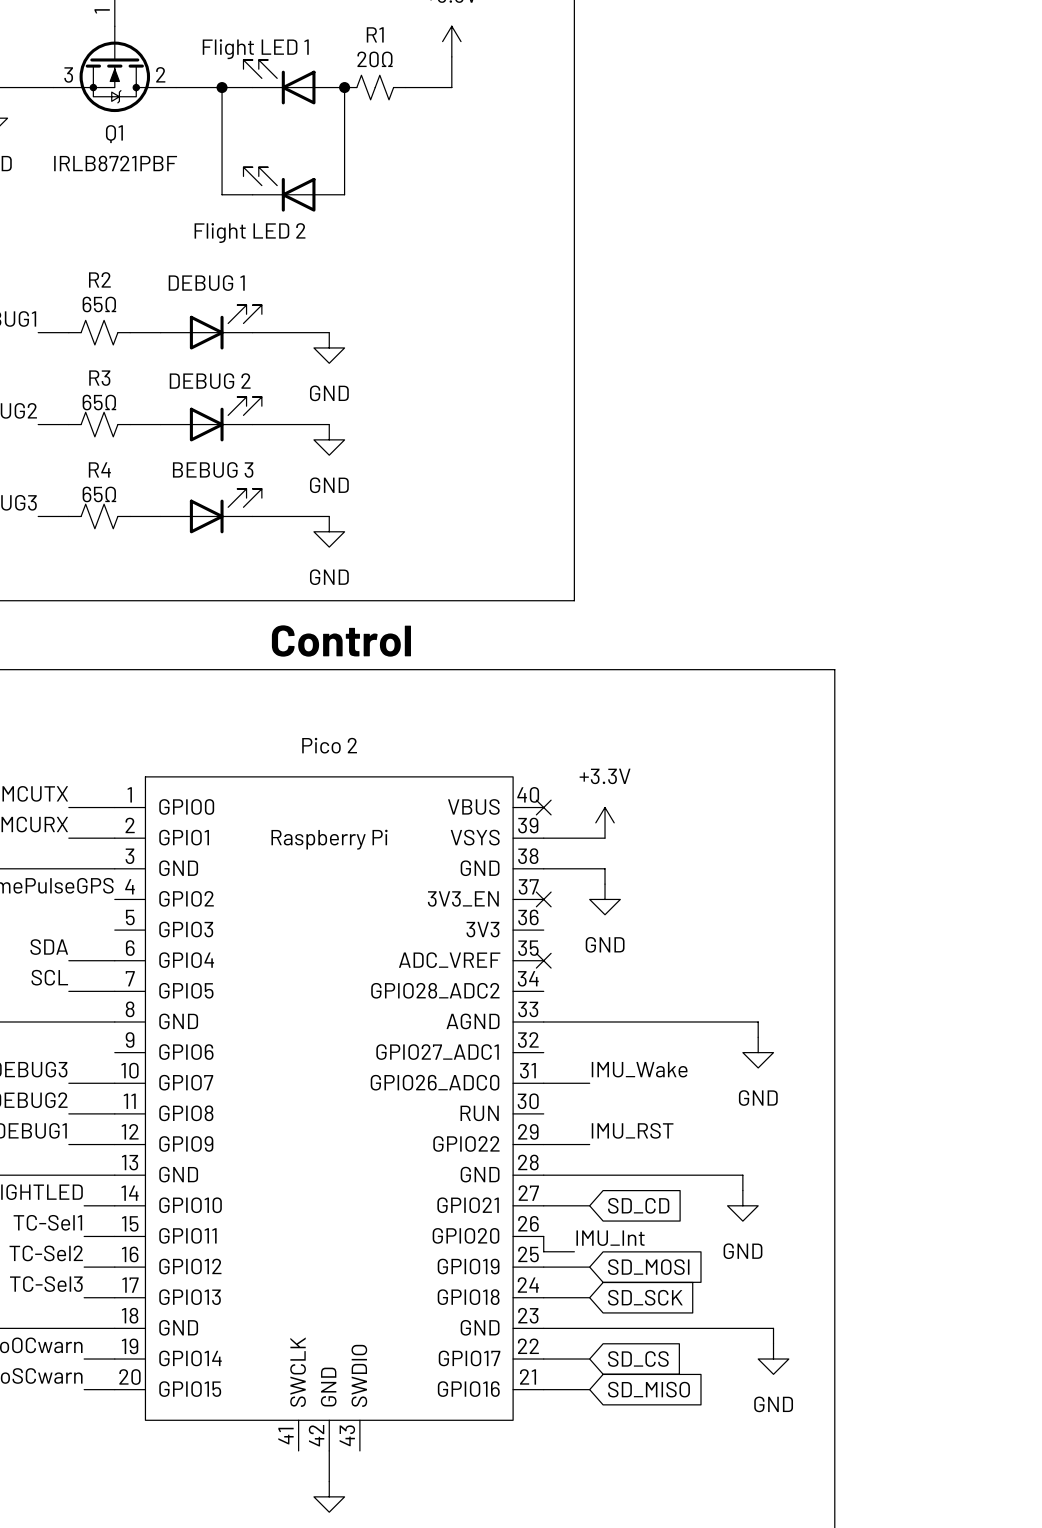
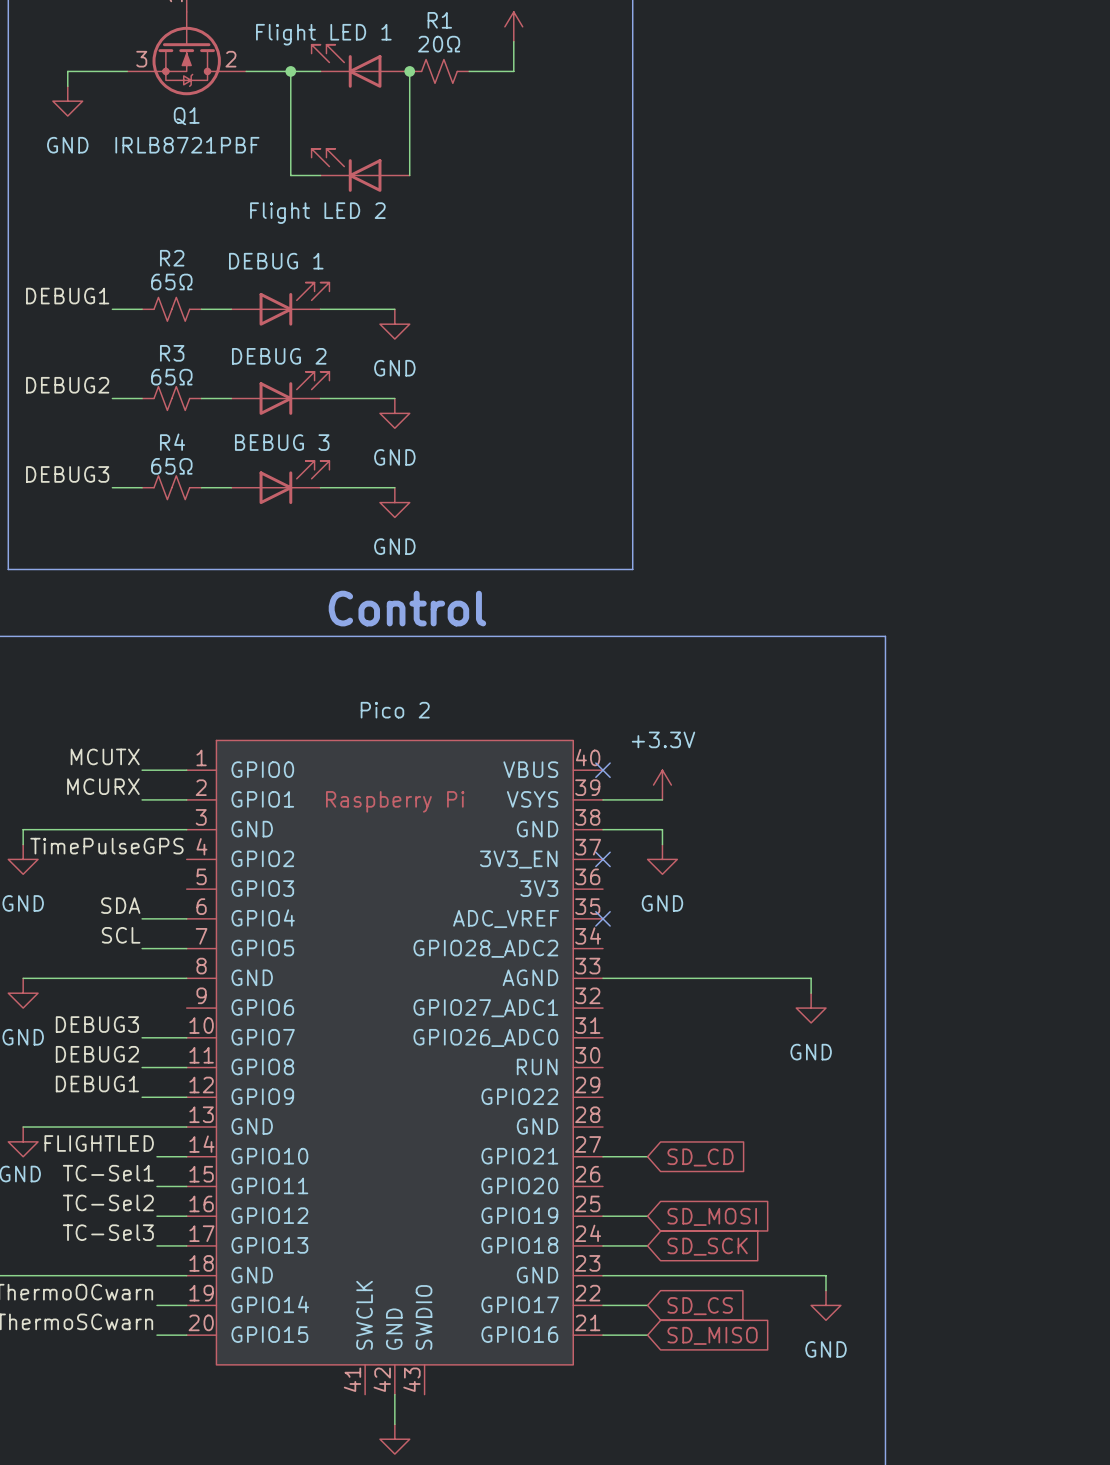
label: IMU_Wake (639, 1069) -> none
wire: (543, 1083) (589, 1083) -> none
label: IMU_RST (632, 1130) -> none
wire: (543, 1144) (589, 1144) -> none
wire: (543, 1175) (742, 1175) (742, 1190) -> none
power symbol: GND (742, 1205) -> none
wire: (543, 1236) (543, 1251) (574, 1251) -> none
label: IMU_Int (610, 1238) -> none

